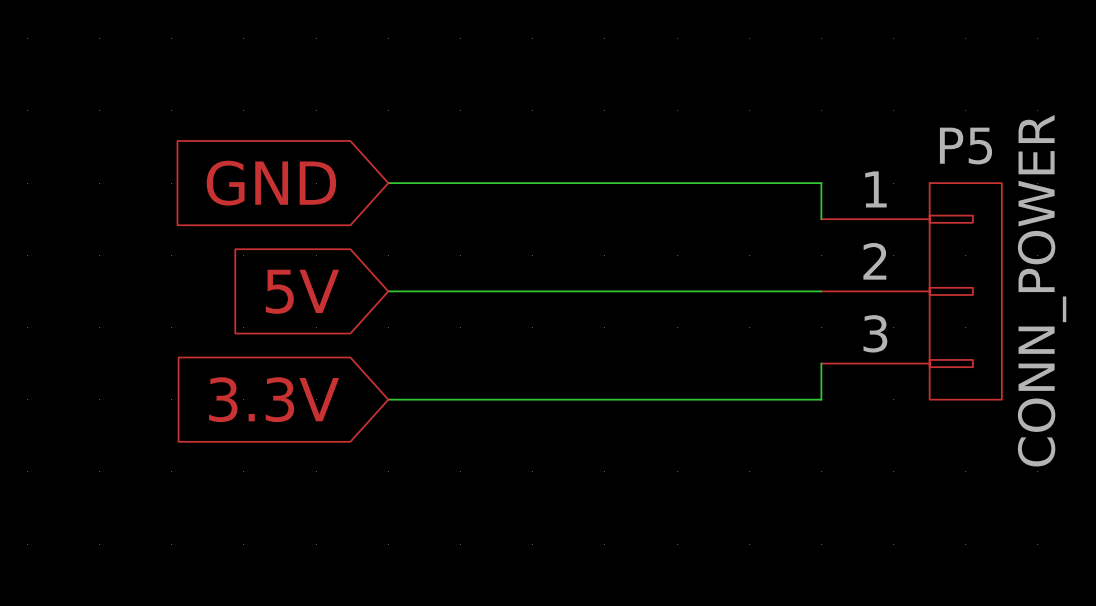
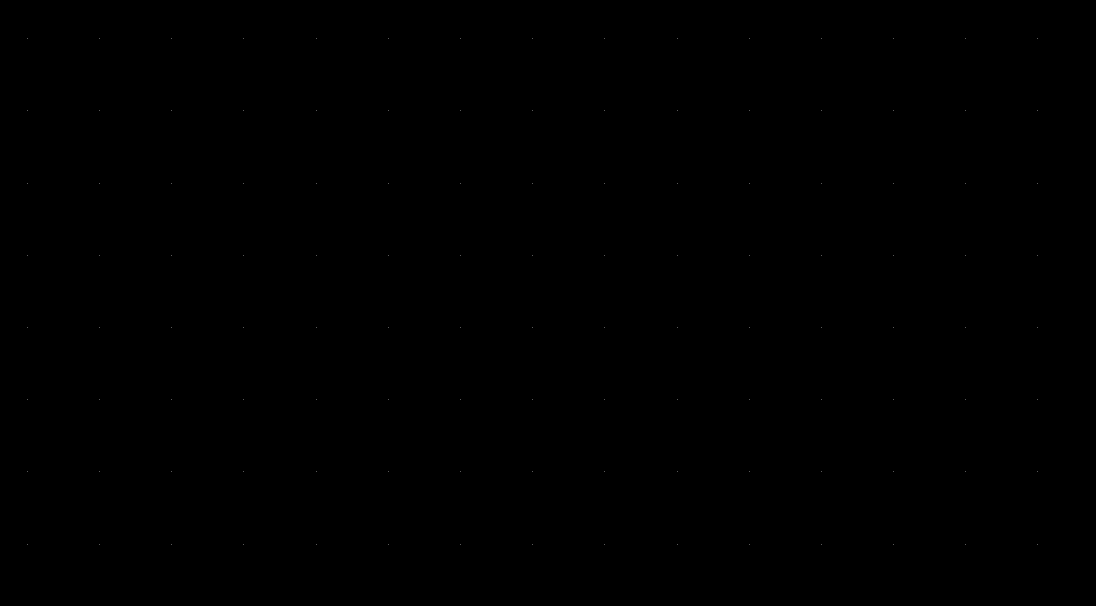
global label: GND (271, 183) -> none
wire: (388, 183) (821, 183) (821, 219) -> none
global label: 5V (302, 291) -> none
wire: (388, 291) (821, 291) -> none
P5: CONN_POWER (911, 291) -> none
wire: (821, 363) (821, 399) (388, 399) -> none
global label: 3.3V (274, 399) -> none

